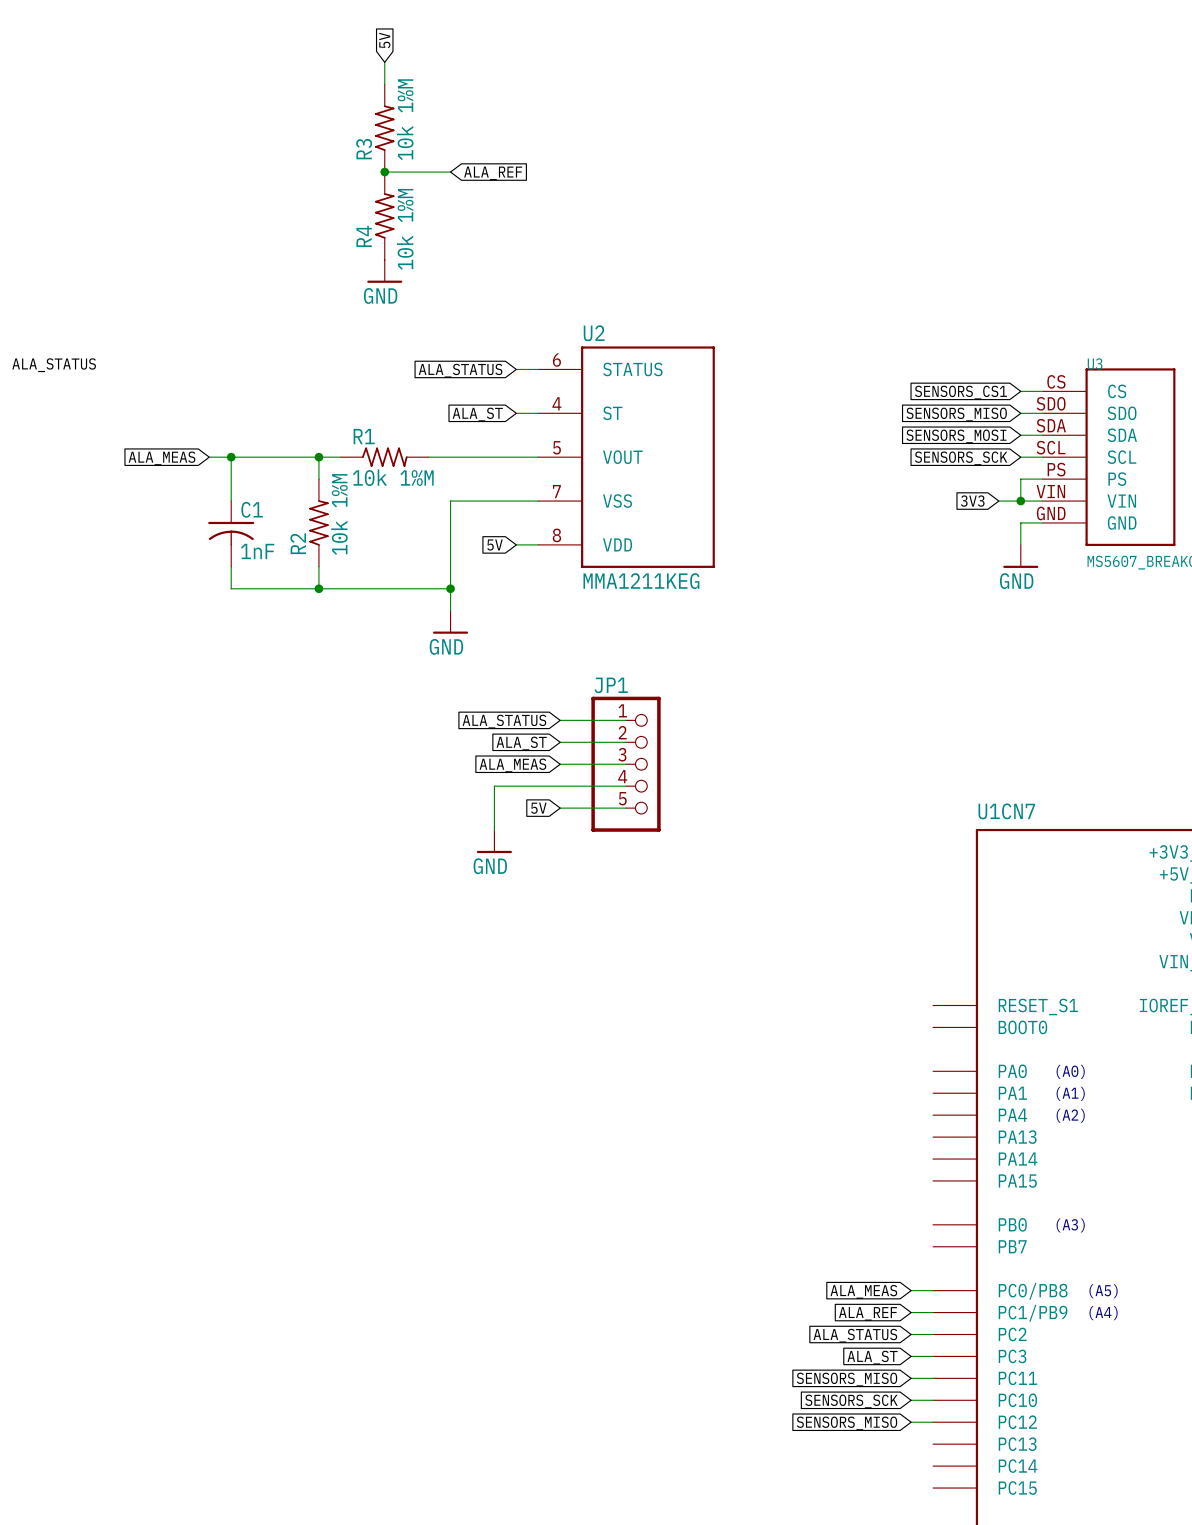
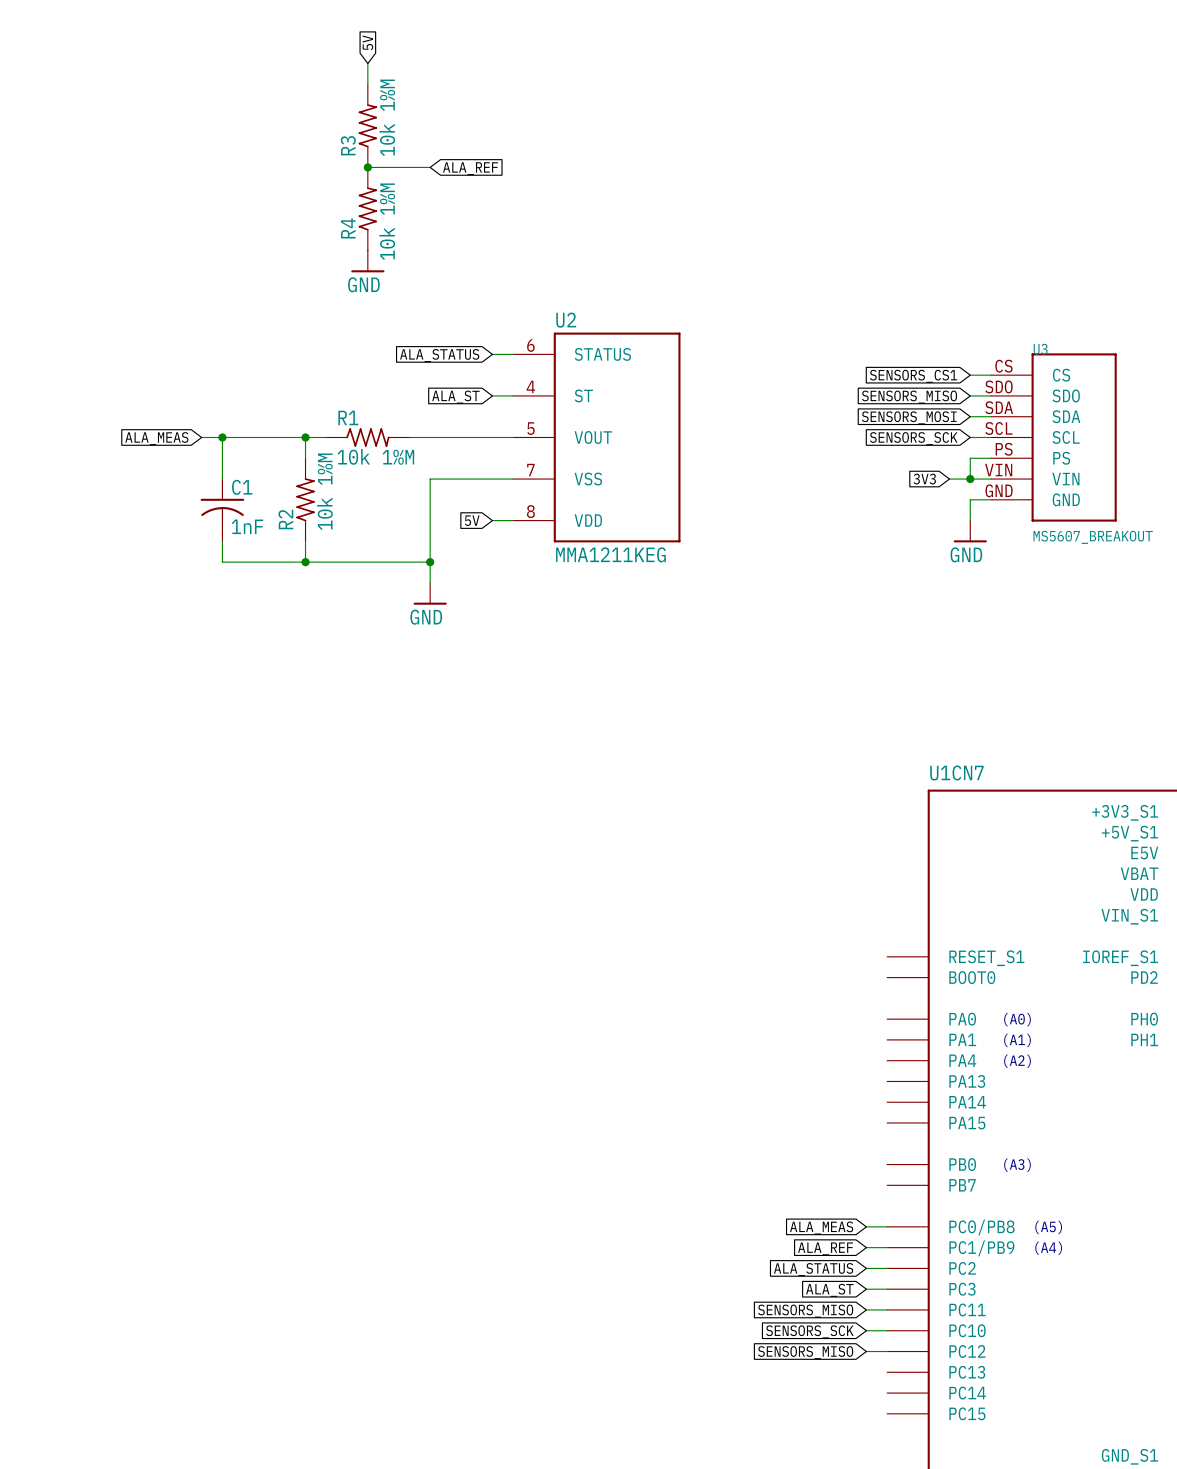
label: ALA_STATUS (54, 365) -> none
wire: (560, 720) (626, 720) -> none
global label: ALA_STATUS (504, 721) -> none
wire: (560, 742) (626, 742) -> none
global label: ALA_ST (521, 743) -> none
wire: (560, 764) (626, 764) -> none
JP1: (626, 764) -> none
global label: ALA_MEAS (512, 765) -> none
wire: (626, 786) (494, 786) (494, 830) -> none
global label: 5V (538, 808) -> none
wire: (560, 808) (626, 808) -> none
power symbol: GND (494, 841) -> none

